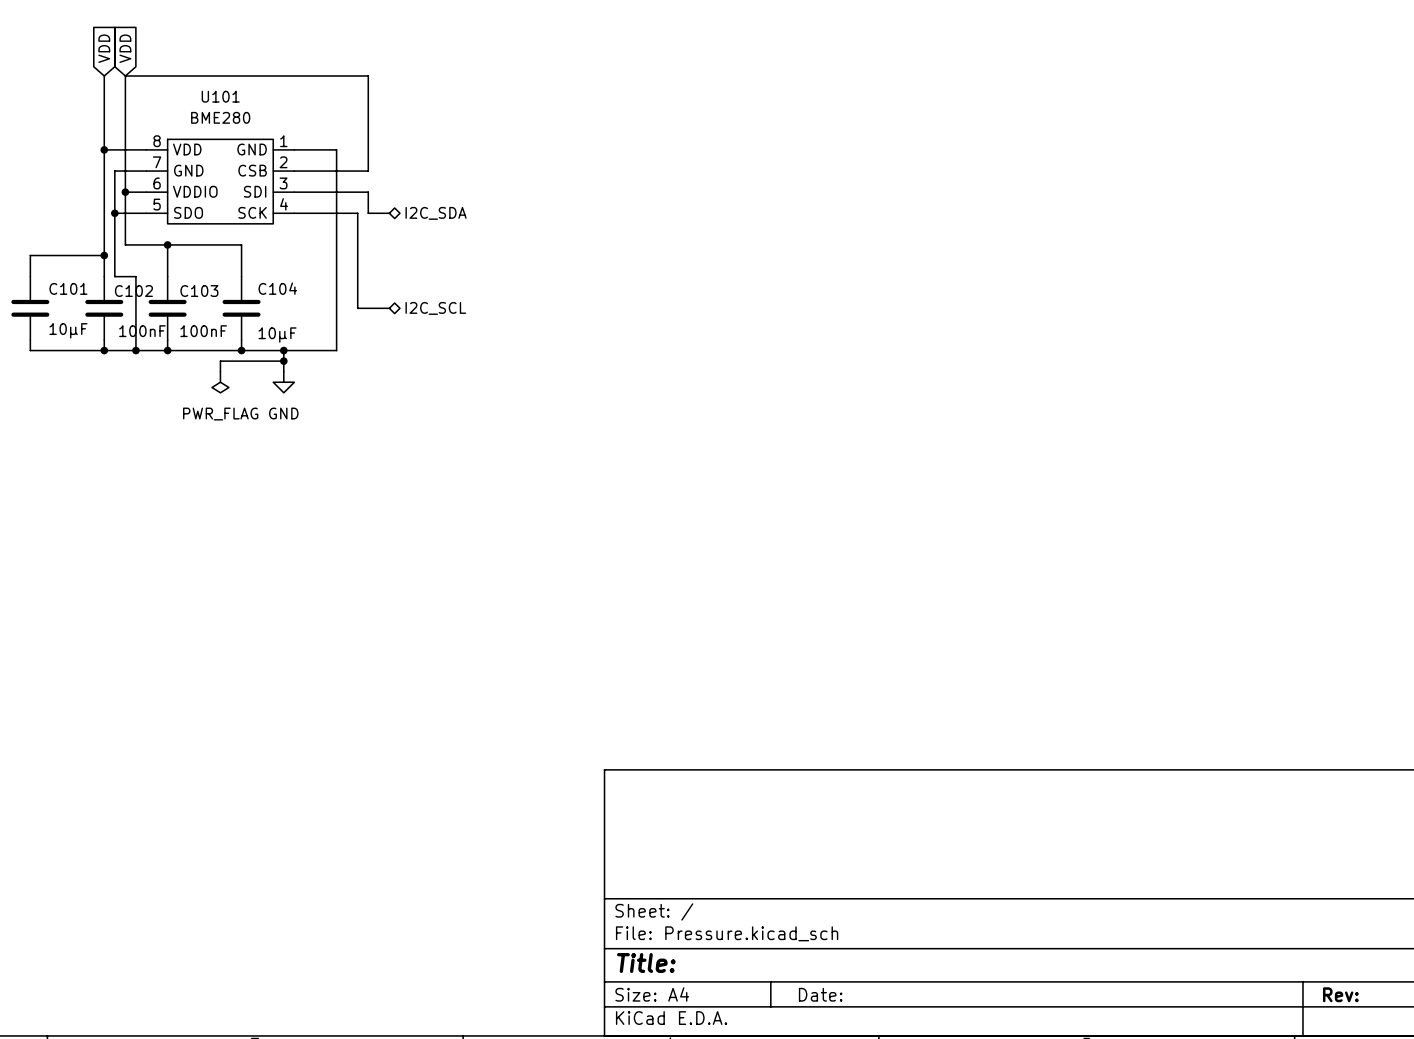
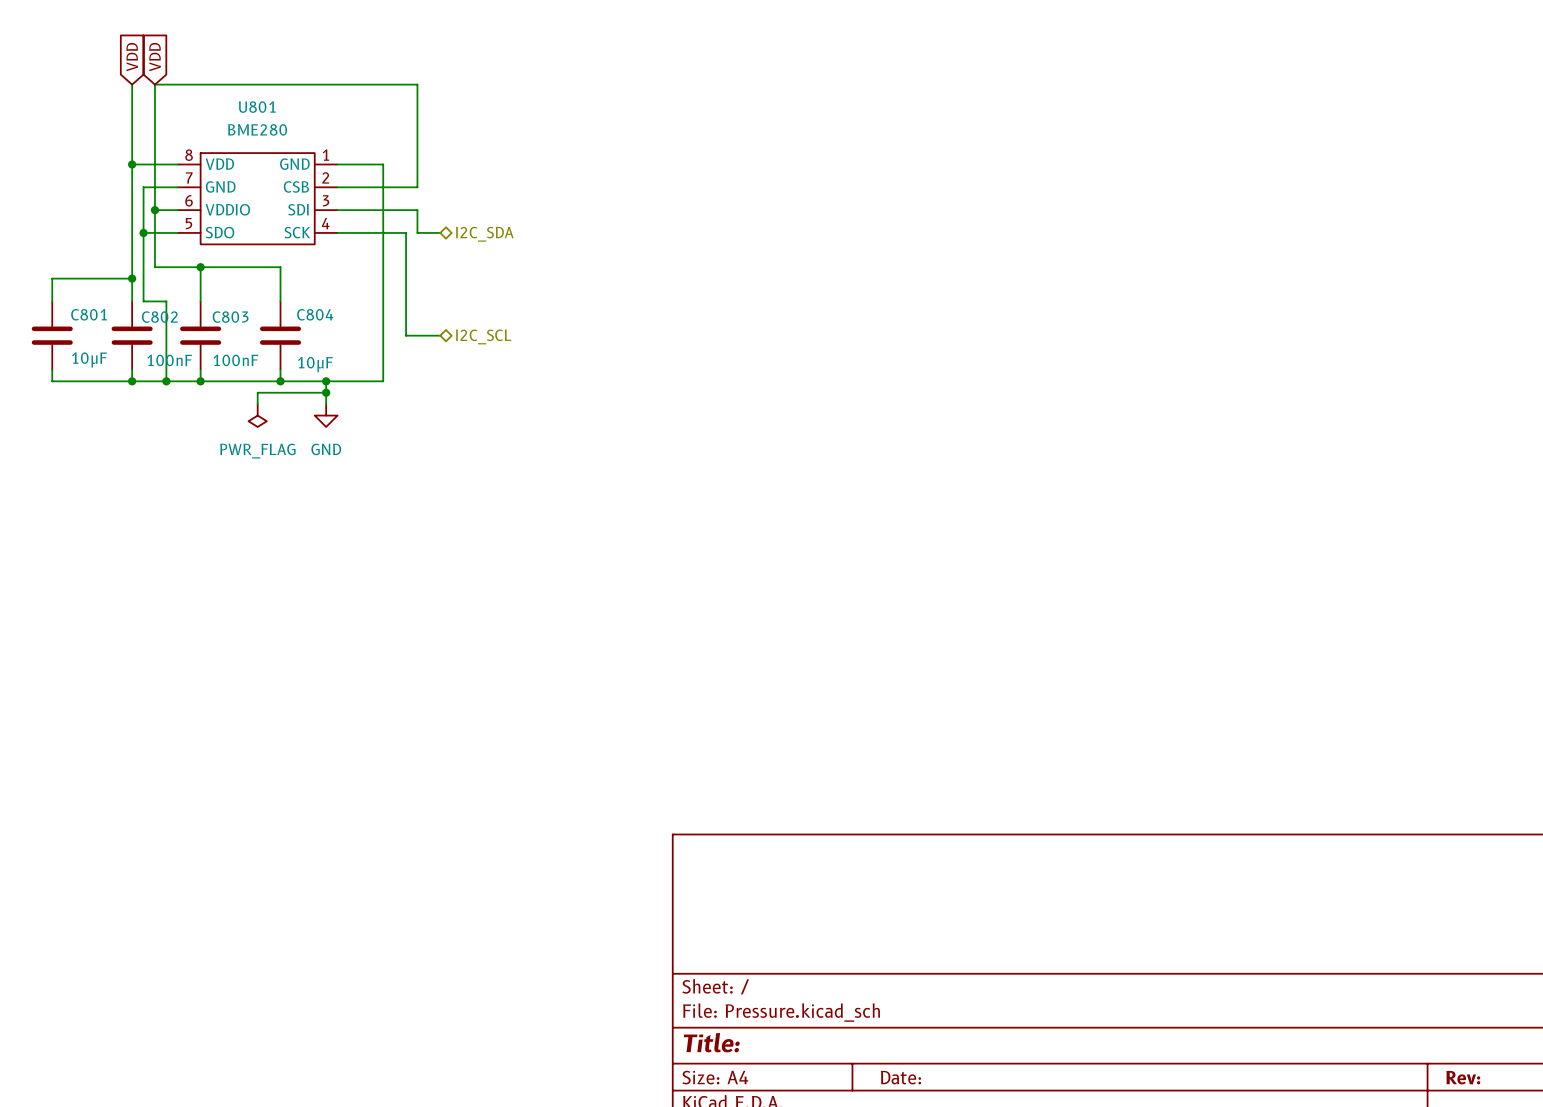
U101 name: U101 (220, 96) -> U801 (257, 107)
C101 name: C101 (68, 288) -> C801 (89, 314)
C104 name: C104 (277, 288) -> C804 (315, 314)
C102 name: C102 (133, 291) -> C802 (159, 317)
C103 name: C103 (199, 291) -> C803 (230, 317)

